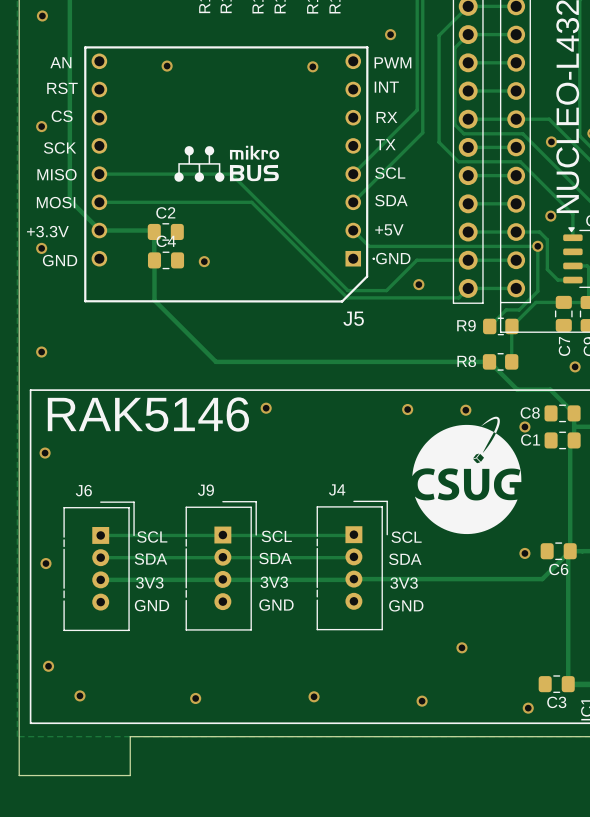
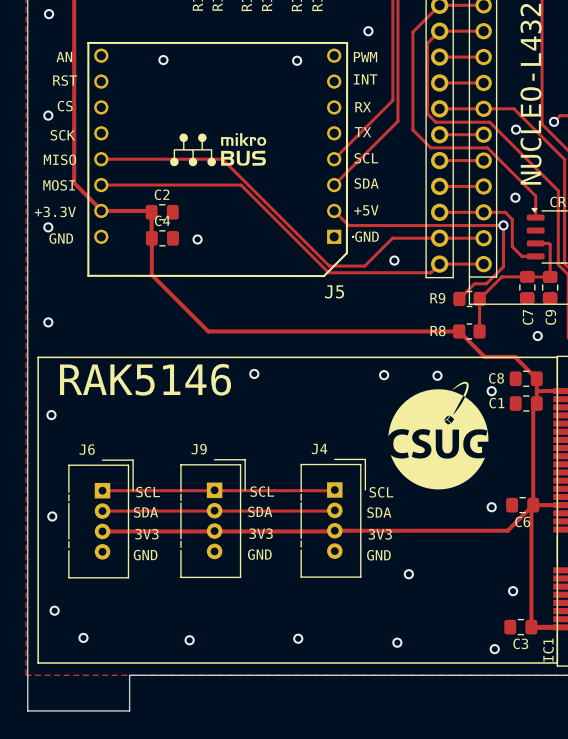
via: none -> (513, 591)
via position: (461, 647) -> (408, 574)

